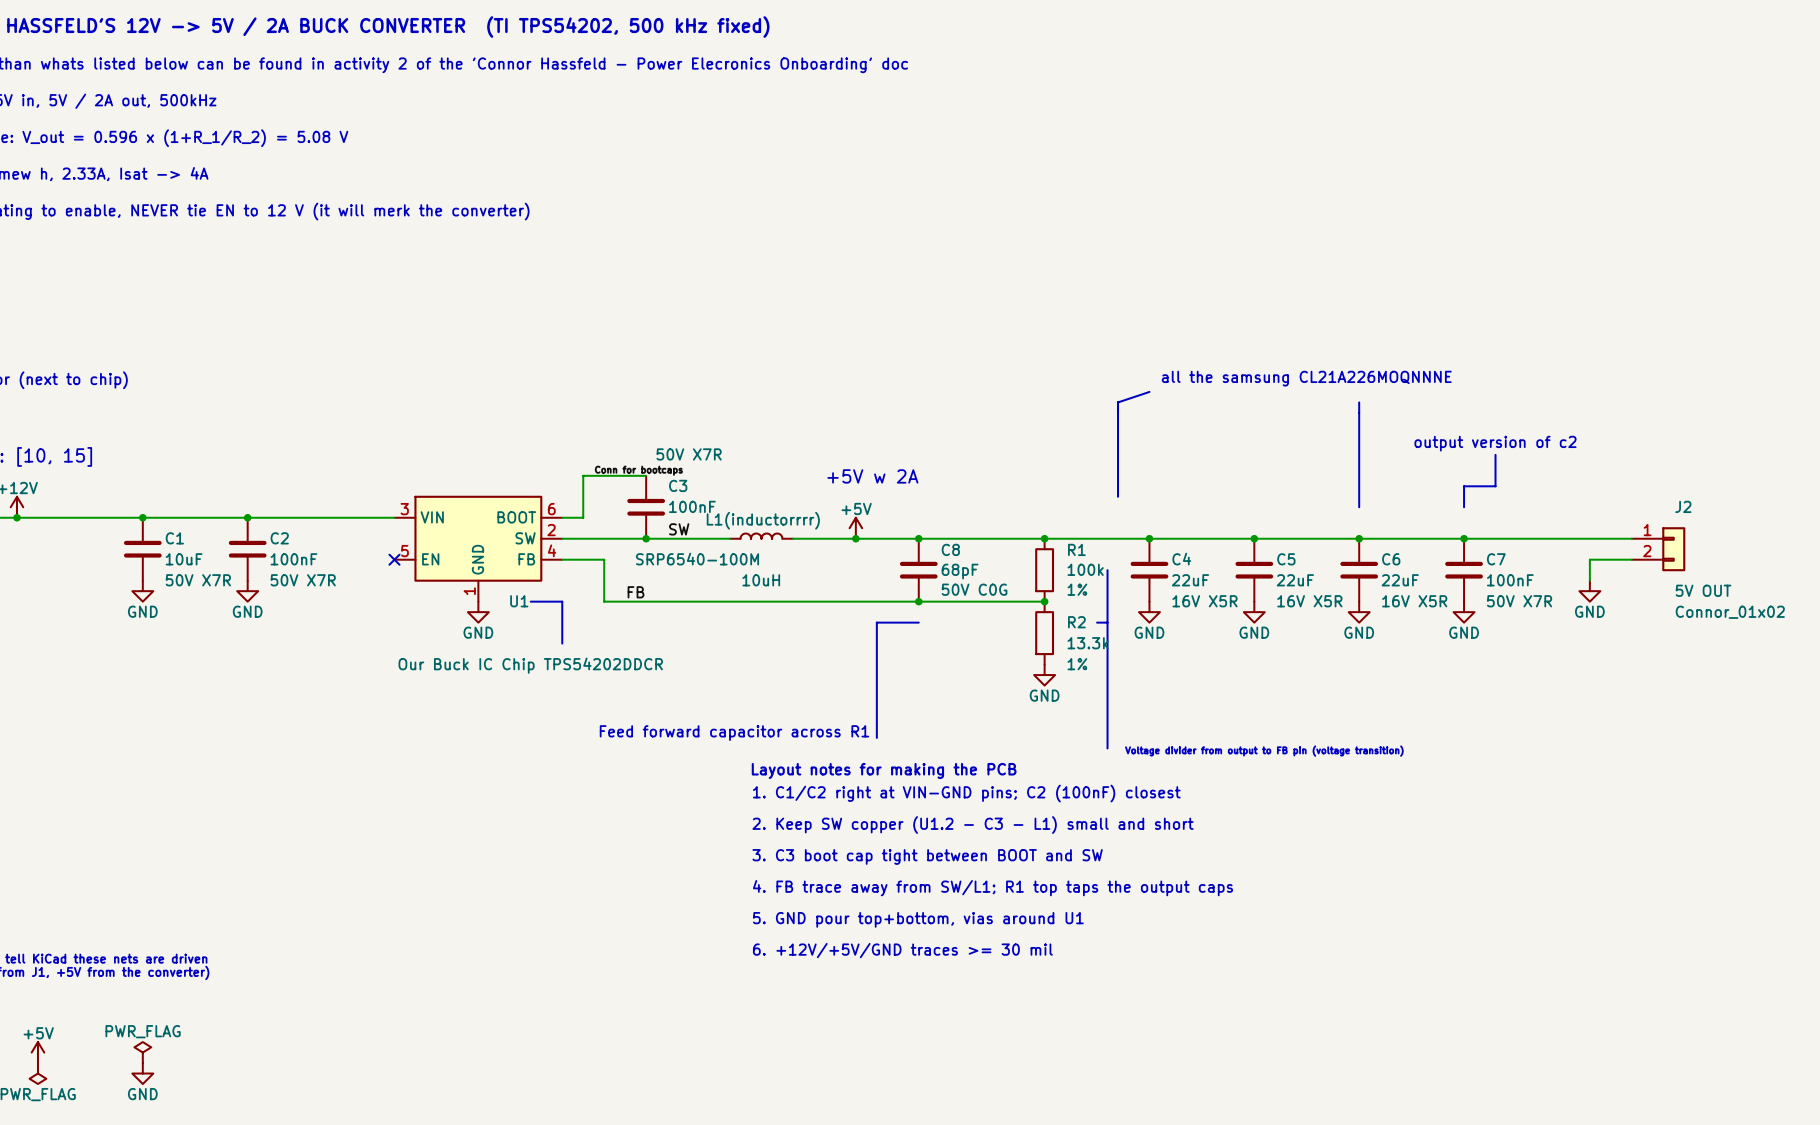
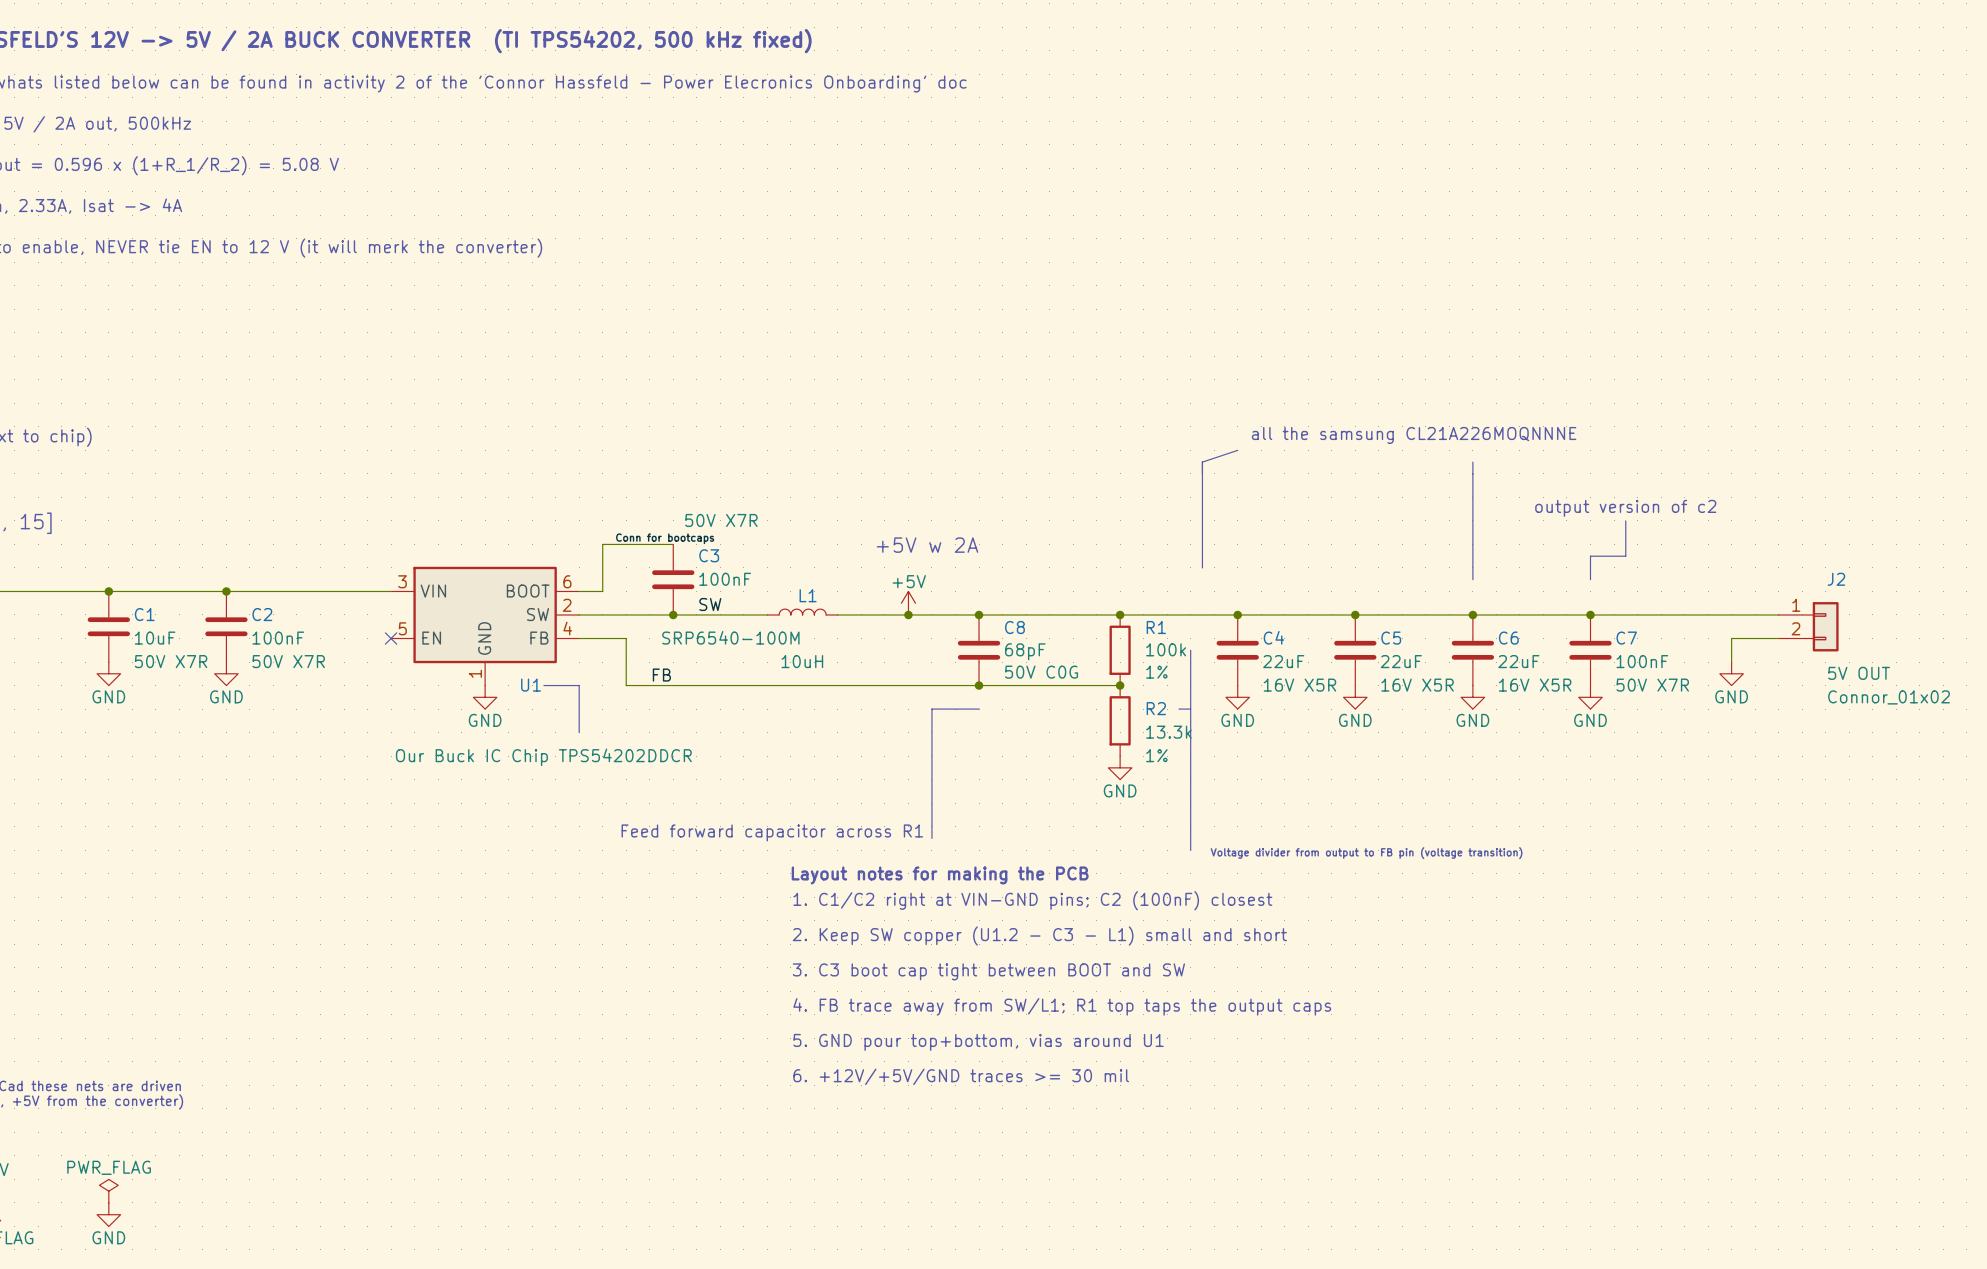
L1(inductorrrr) name: L1(inductorrrr) (763, 520) -> L1 (808, 595)

